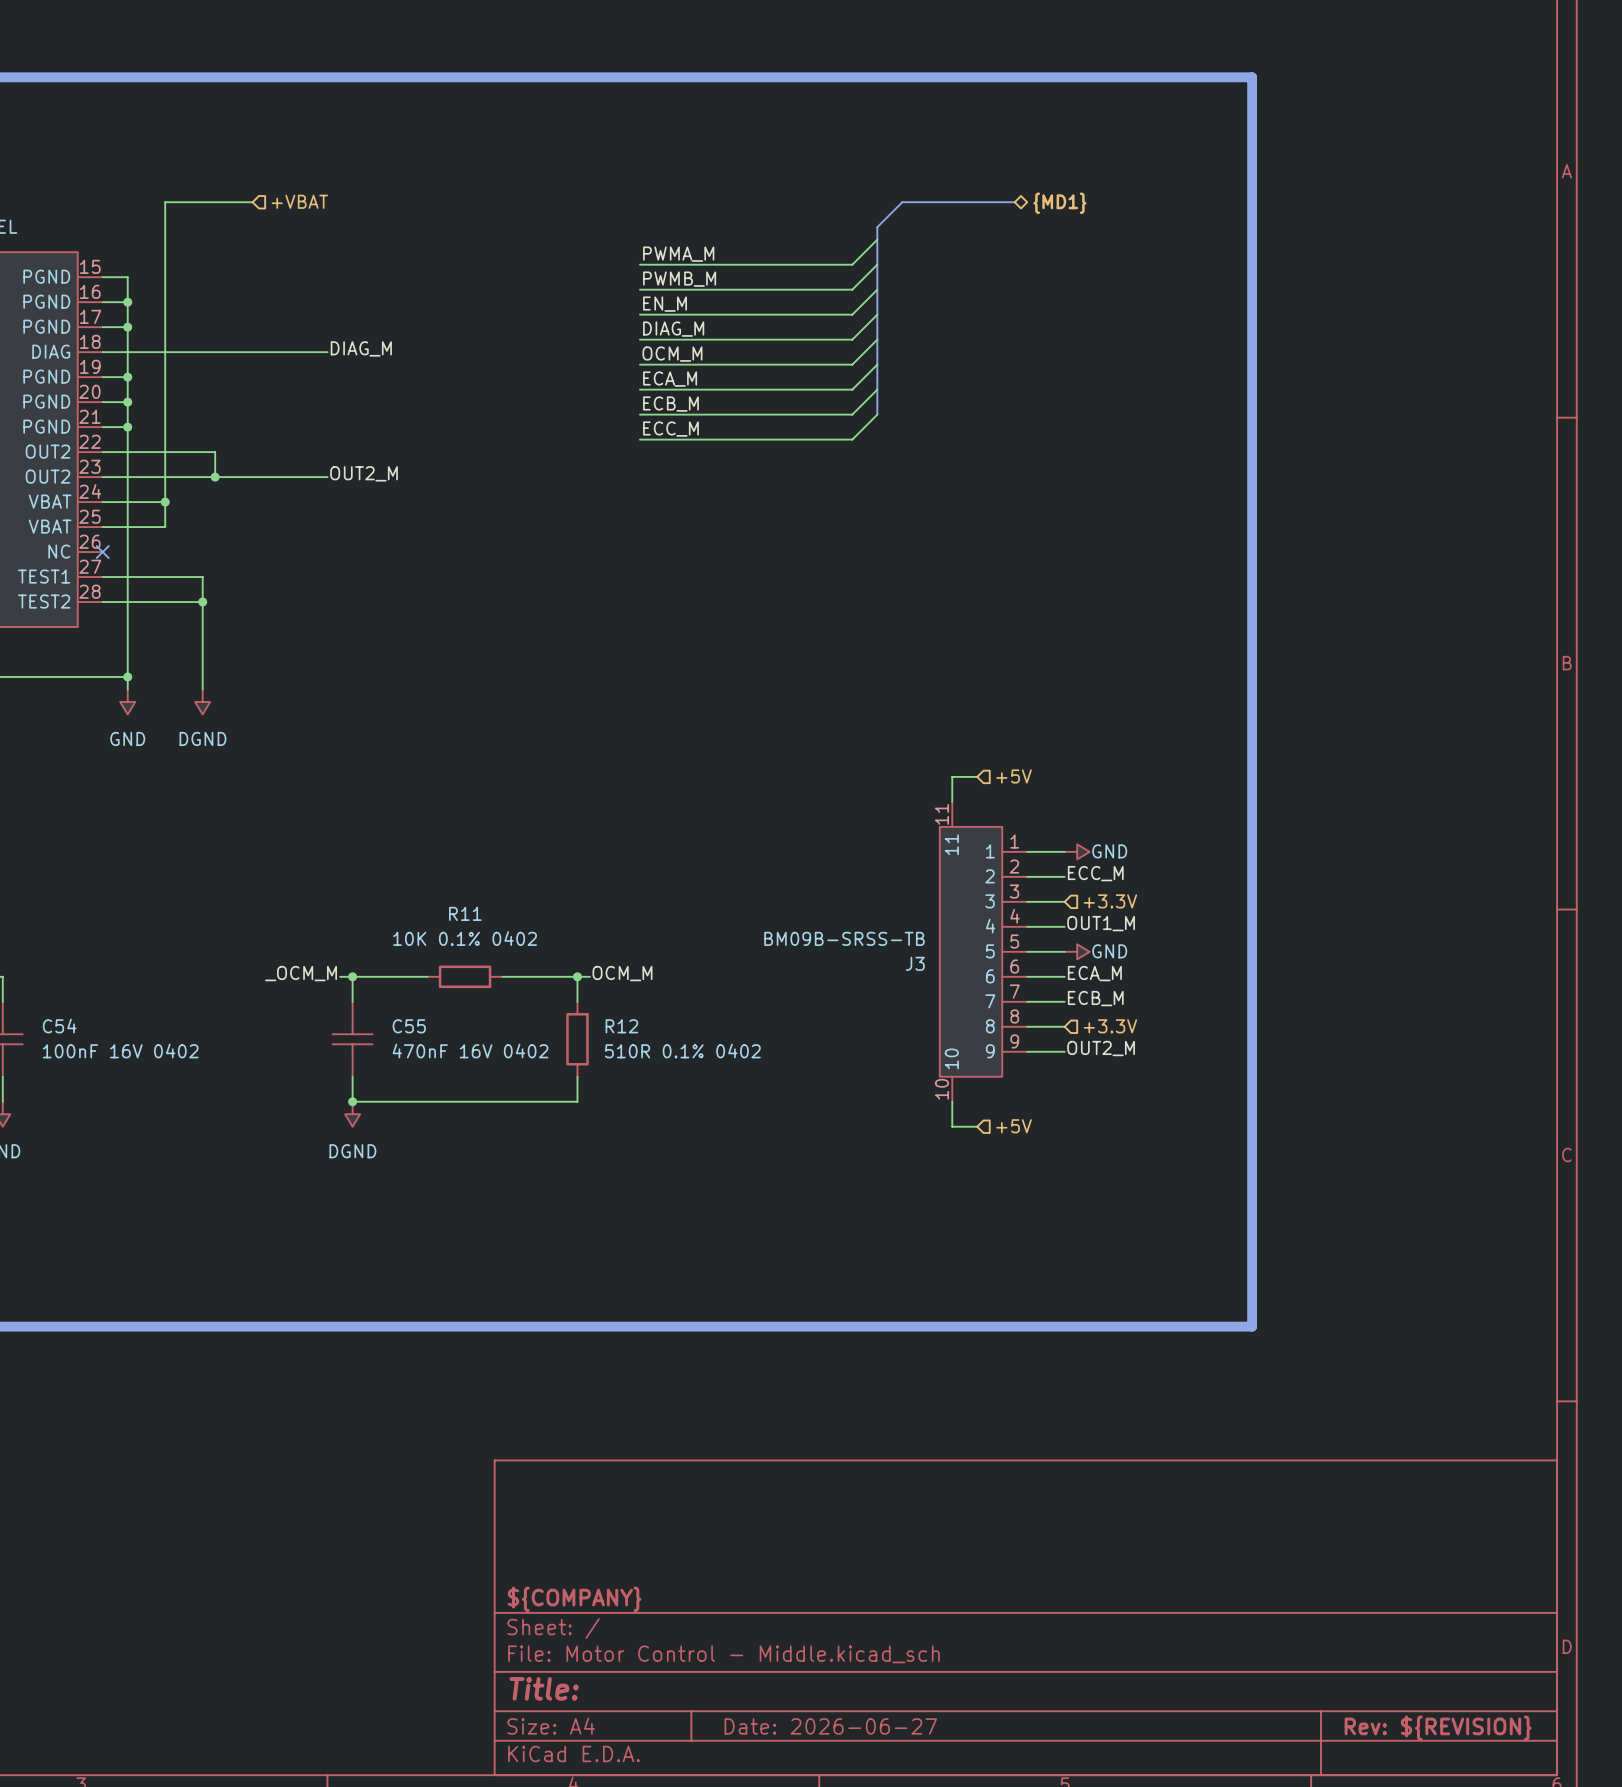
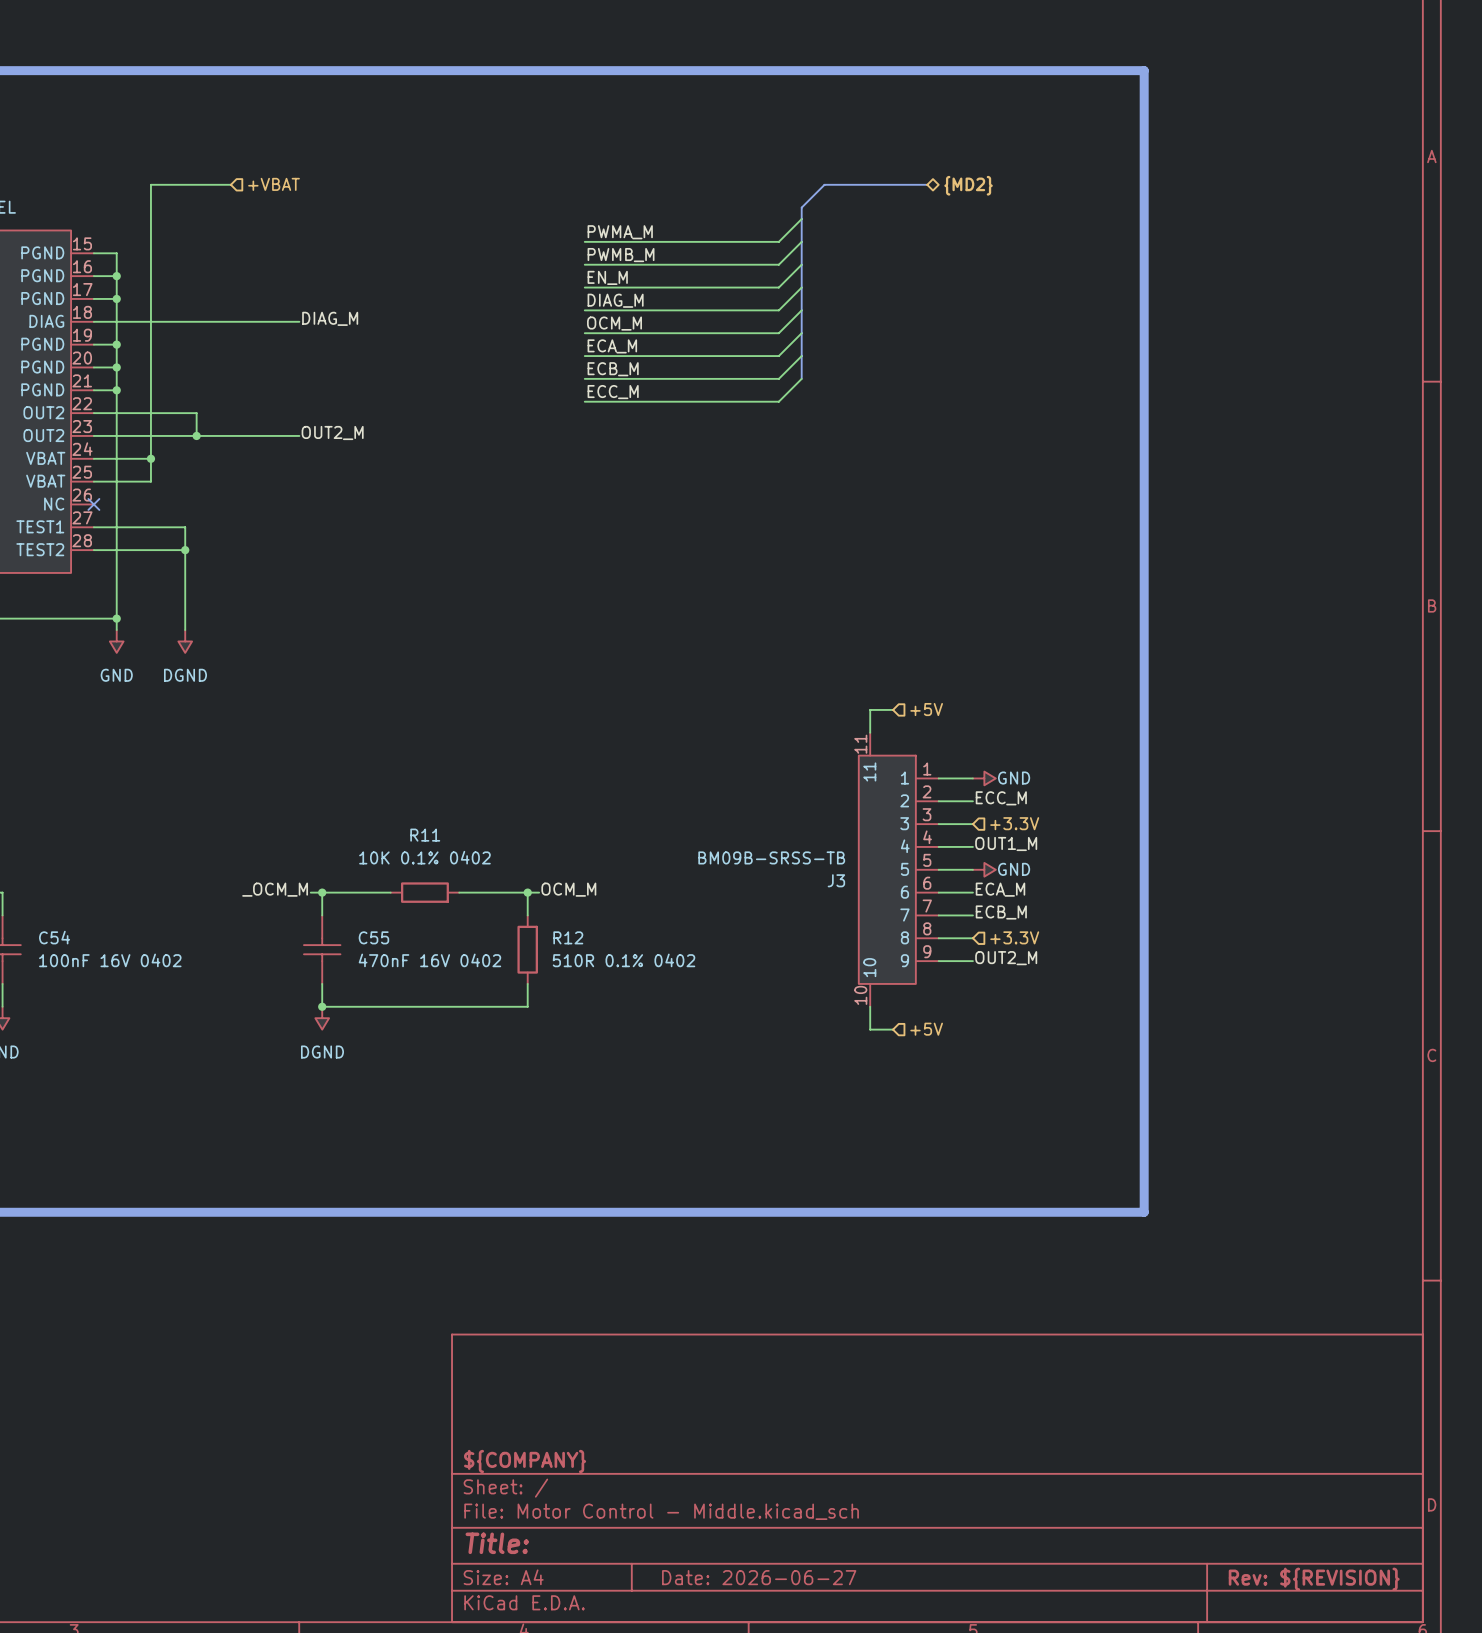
hierarchical label: {MD1} (1059, 203) -> {MD2} (968, 185)

